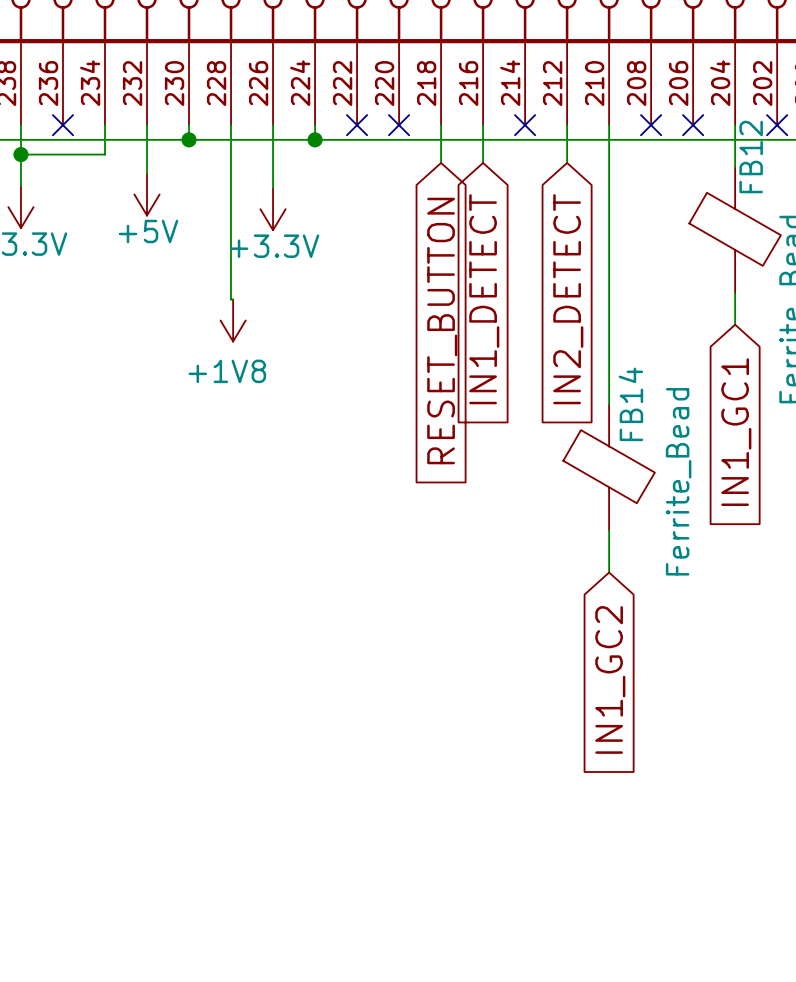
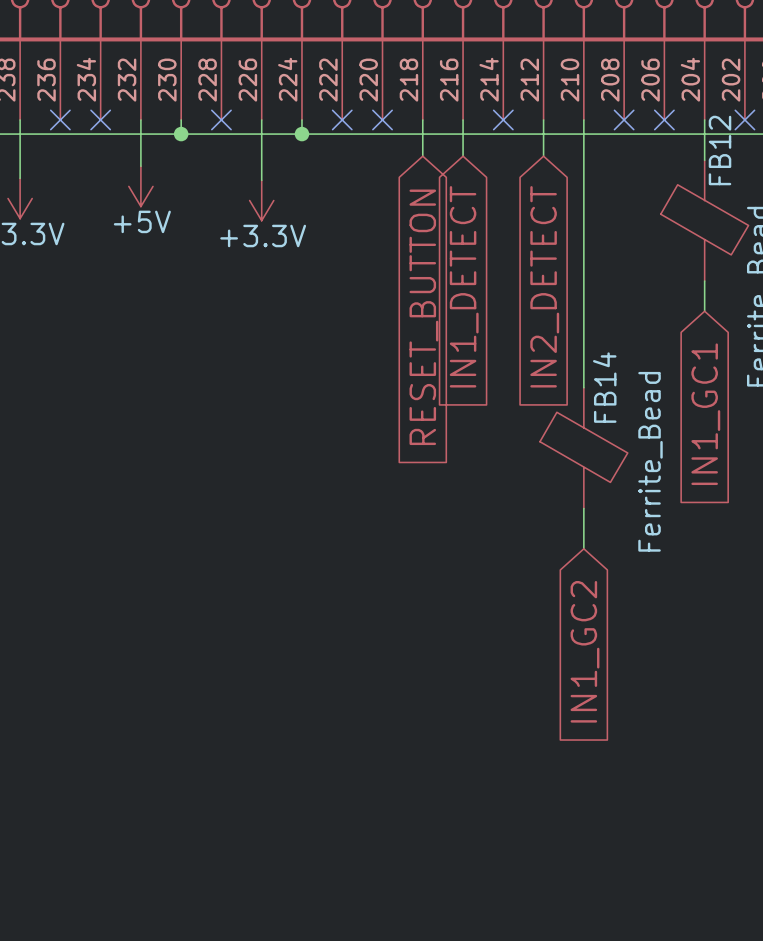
wire: (105, 125) (105, 154) (20, 154) -> none
no-connect mark: none -> (100, 119)
wire: (231, 125) (231, 299) (233, 299) -> none
no-connect mark: none -> (221, 119)
junction: (20, 154) -> none
power symbol: +1V8 (233, 320) -> none

